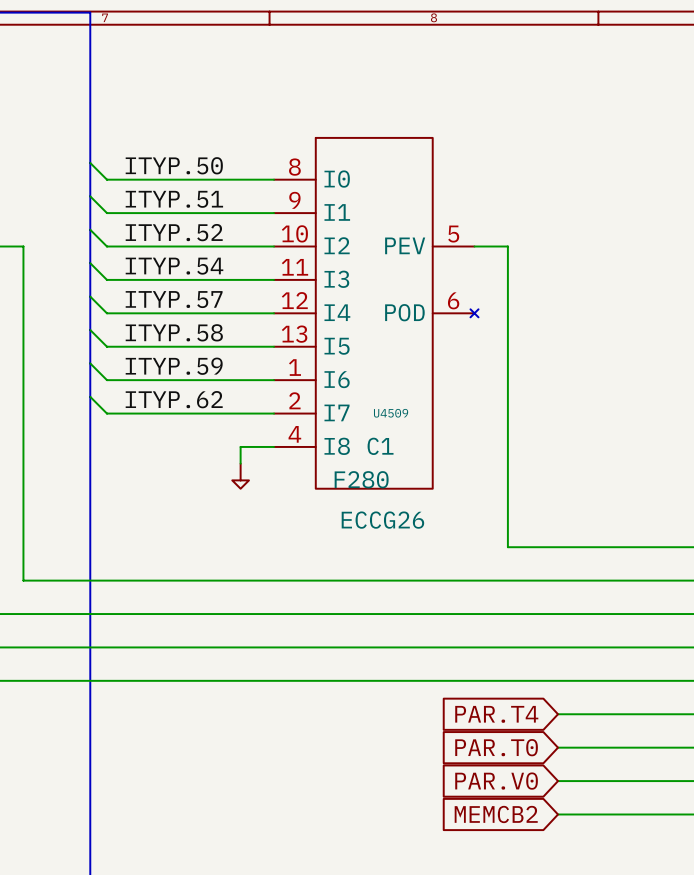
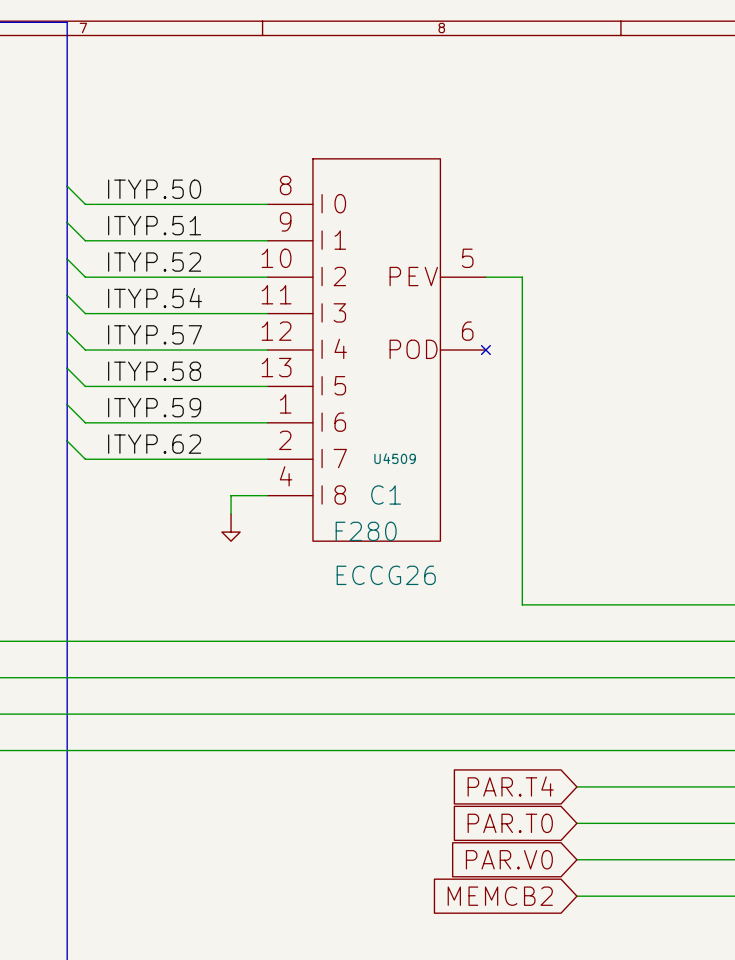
U4509 symbol: [274, 137, 475, 489] -> [267, 158, 486, 542]

